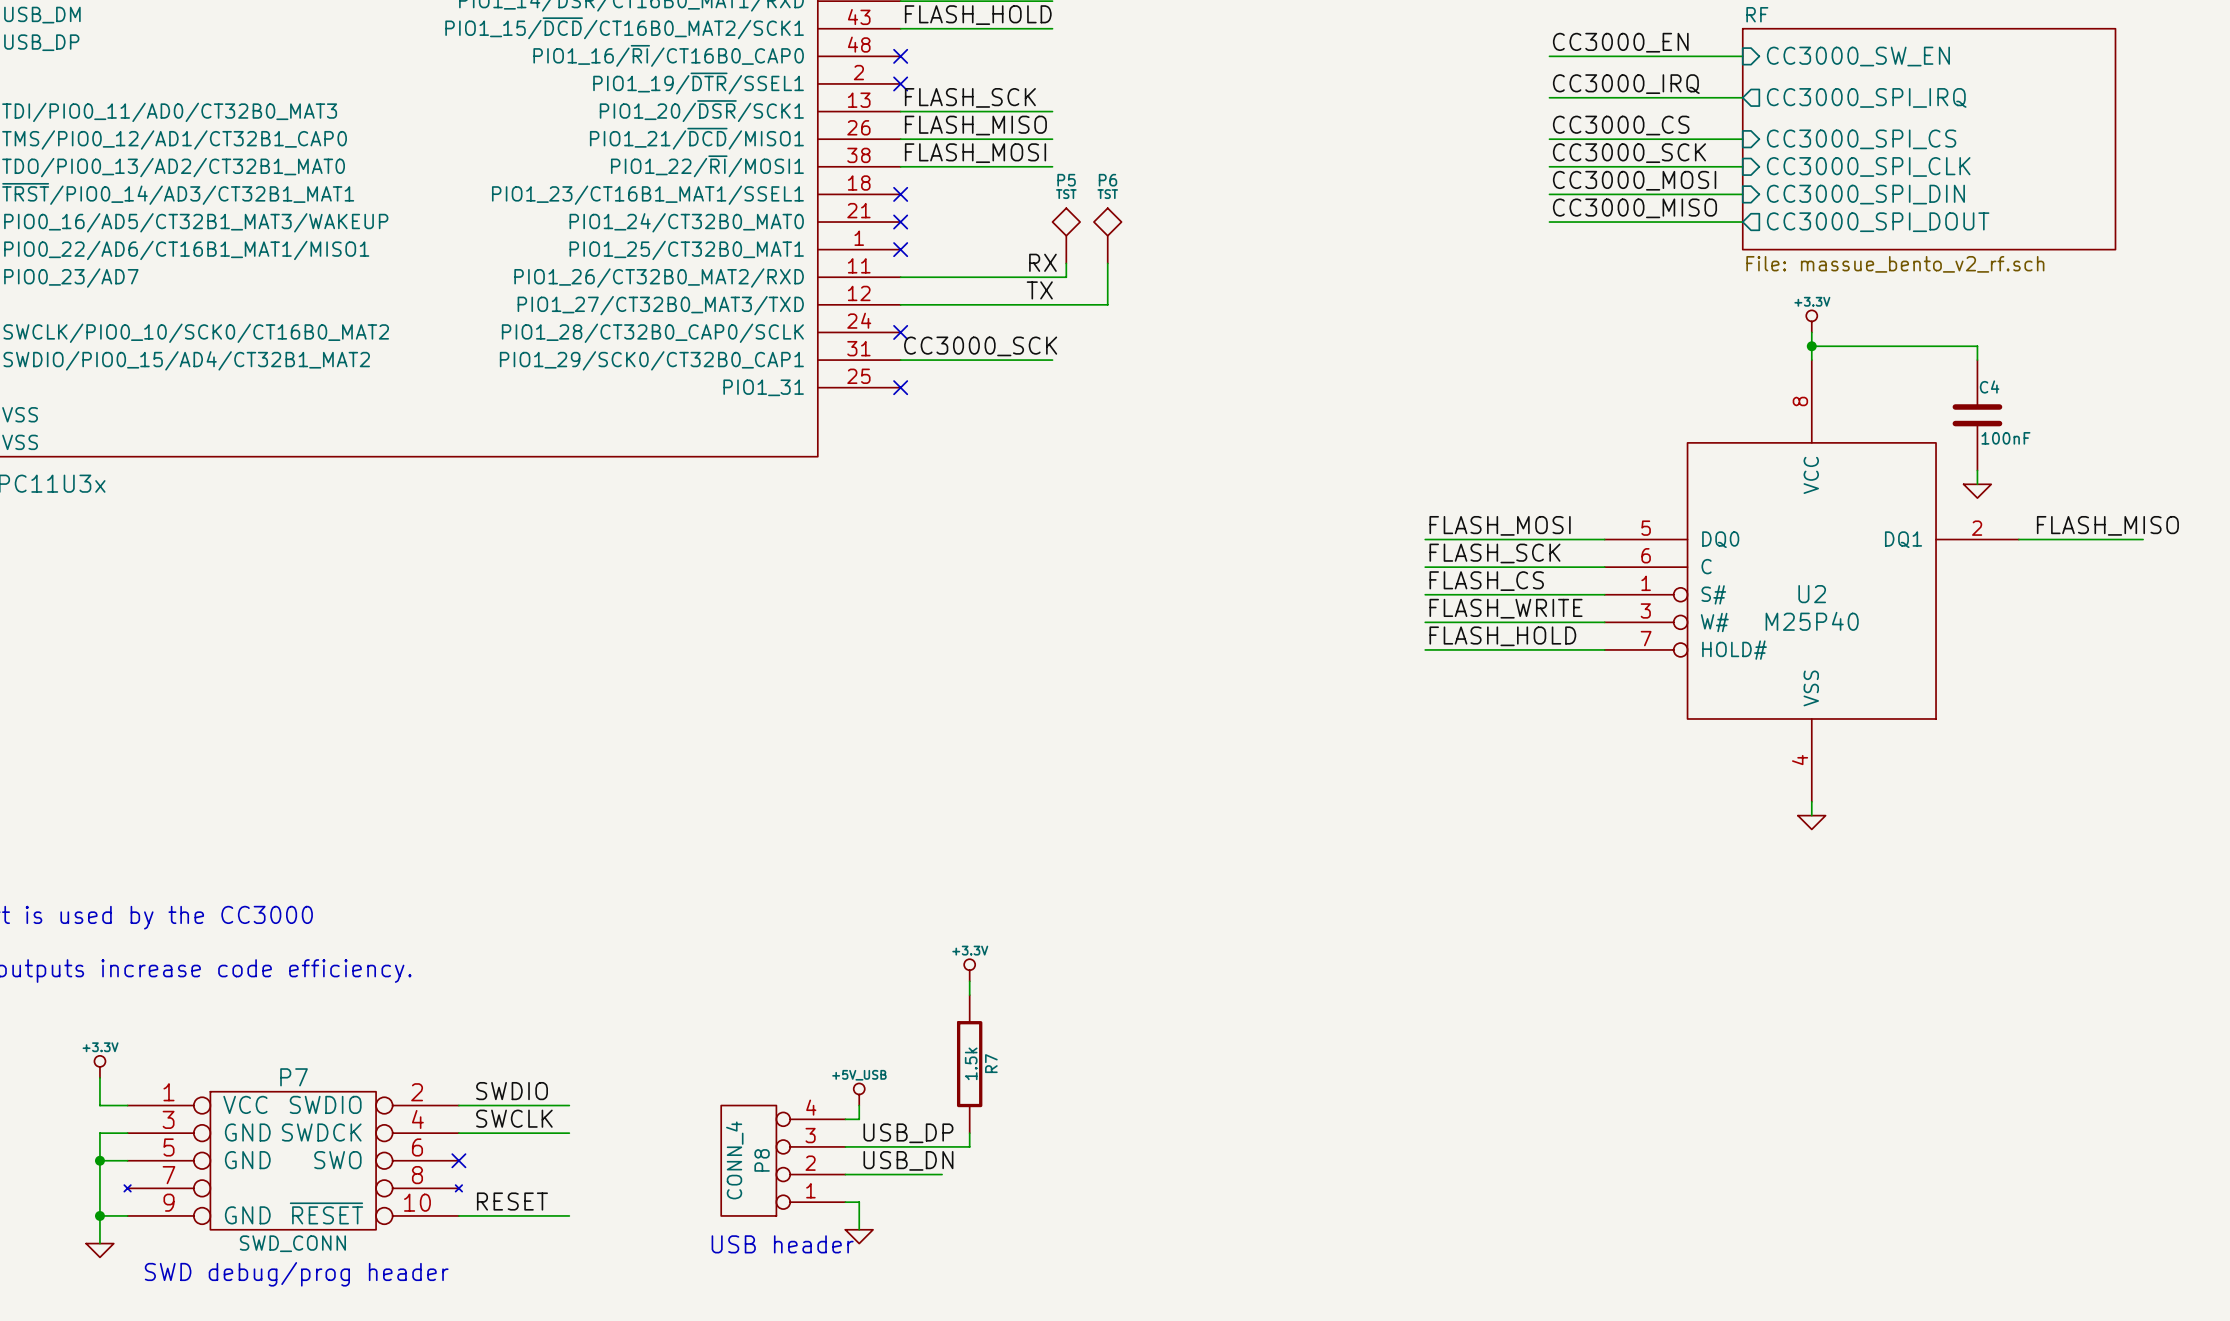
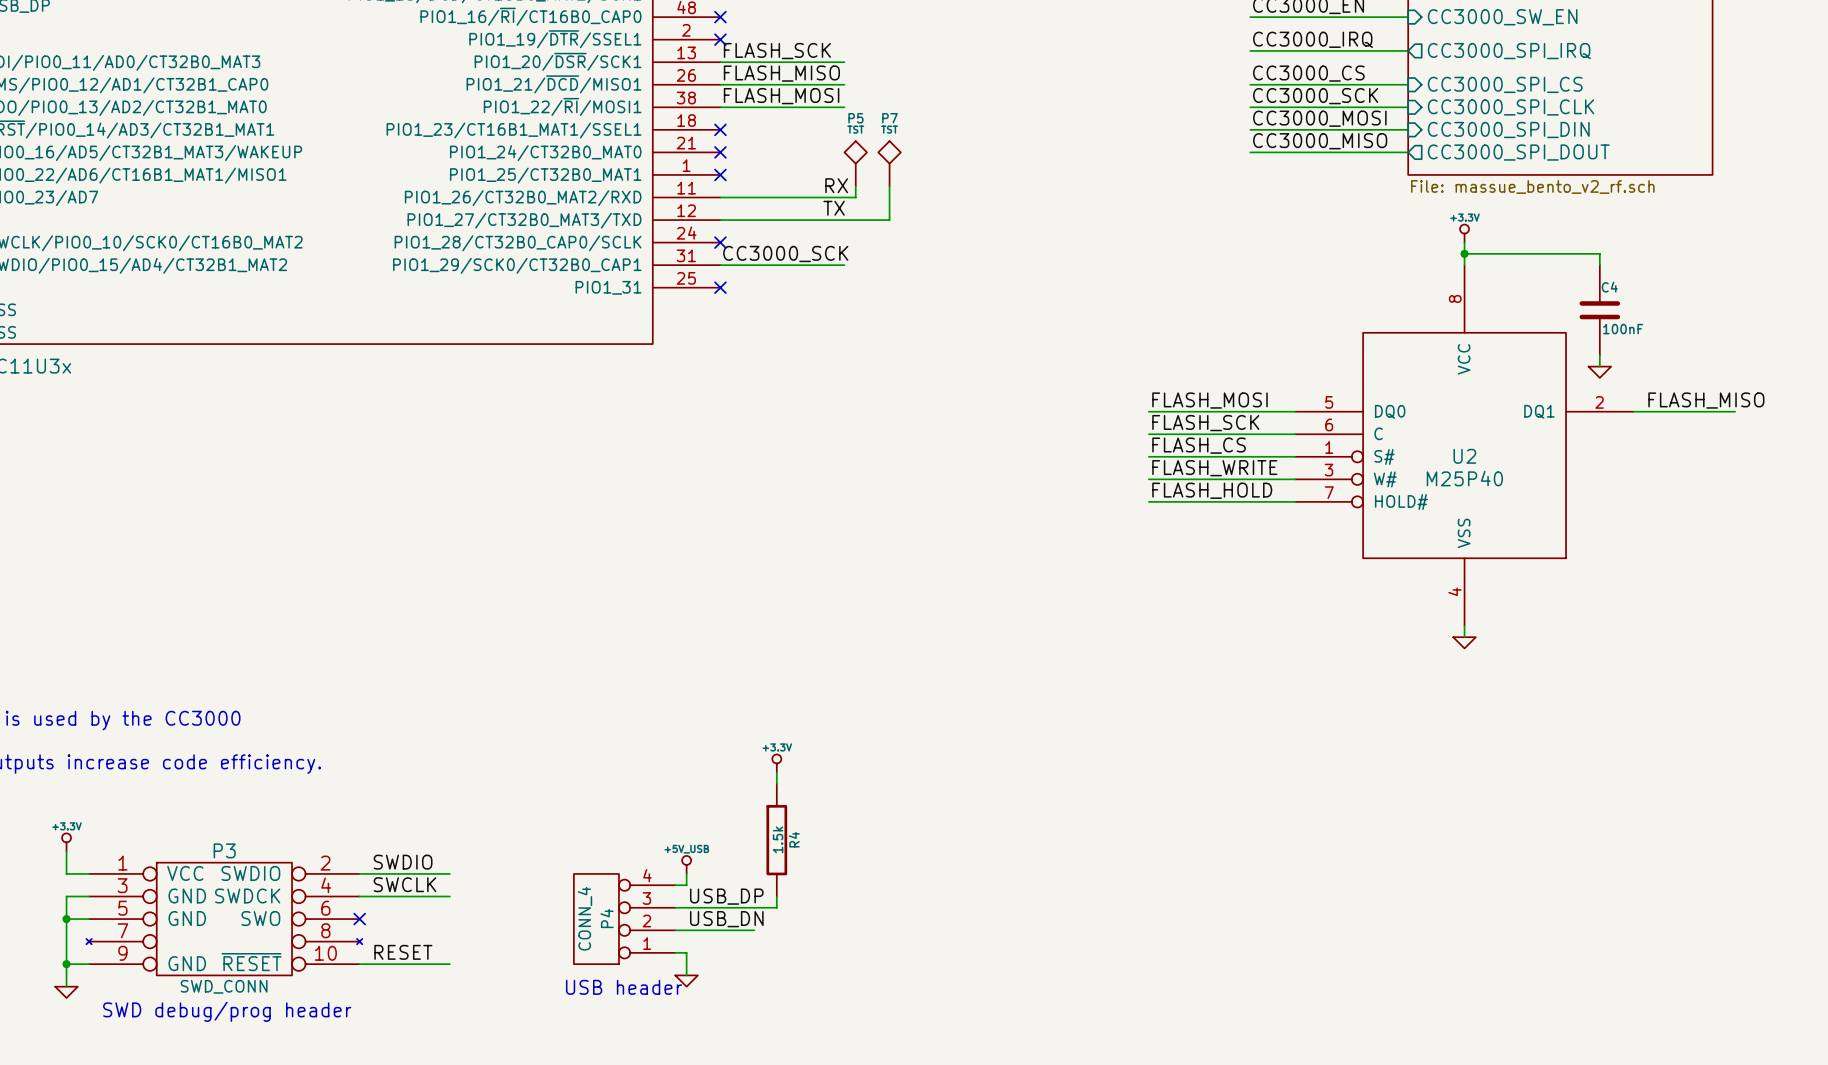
P6 name: P6 (1107, 180) -> P7 (889, 118)
R7 name: R7 (991, 1063) -> R4 (794, 839)
P7 name: P7 (294, 1077) -> P3 (224, 850)
P8 name: P8 (762, 1160) -> P4 (607, 918)

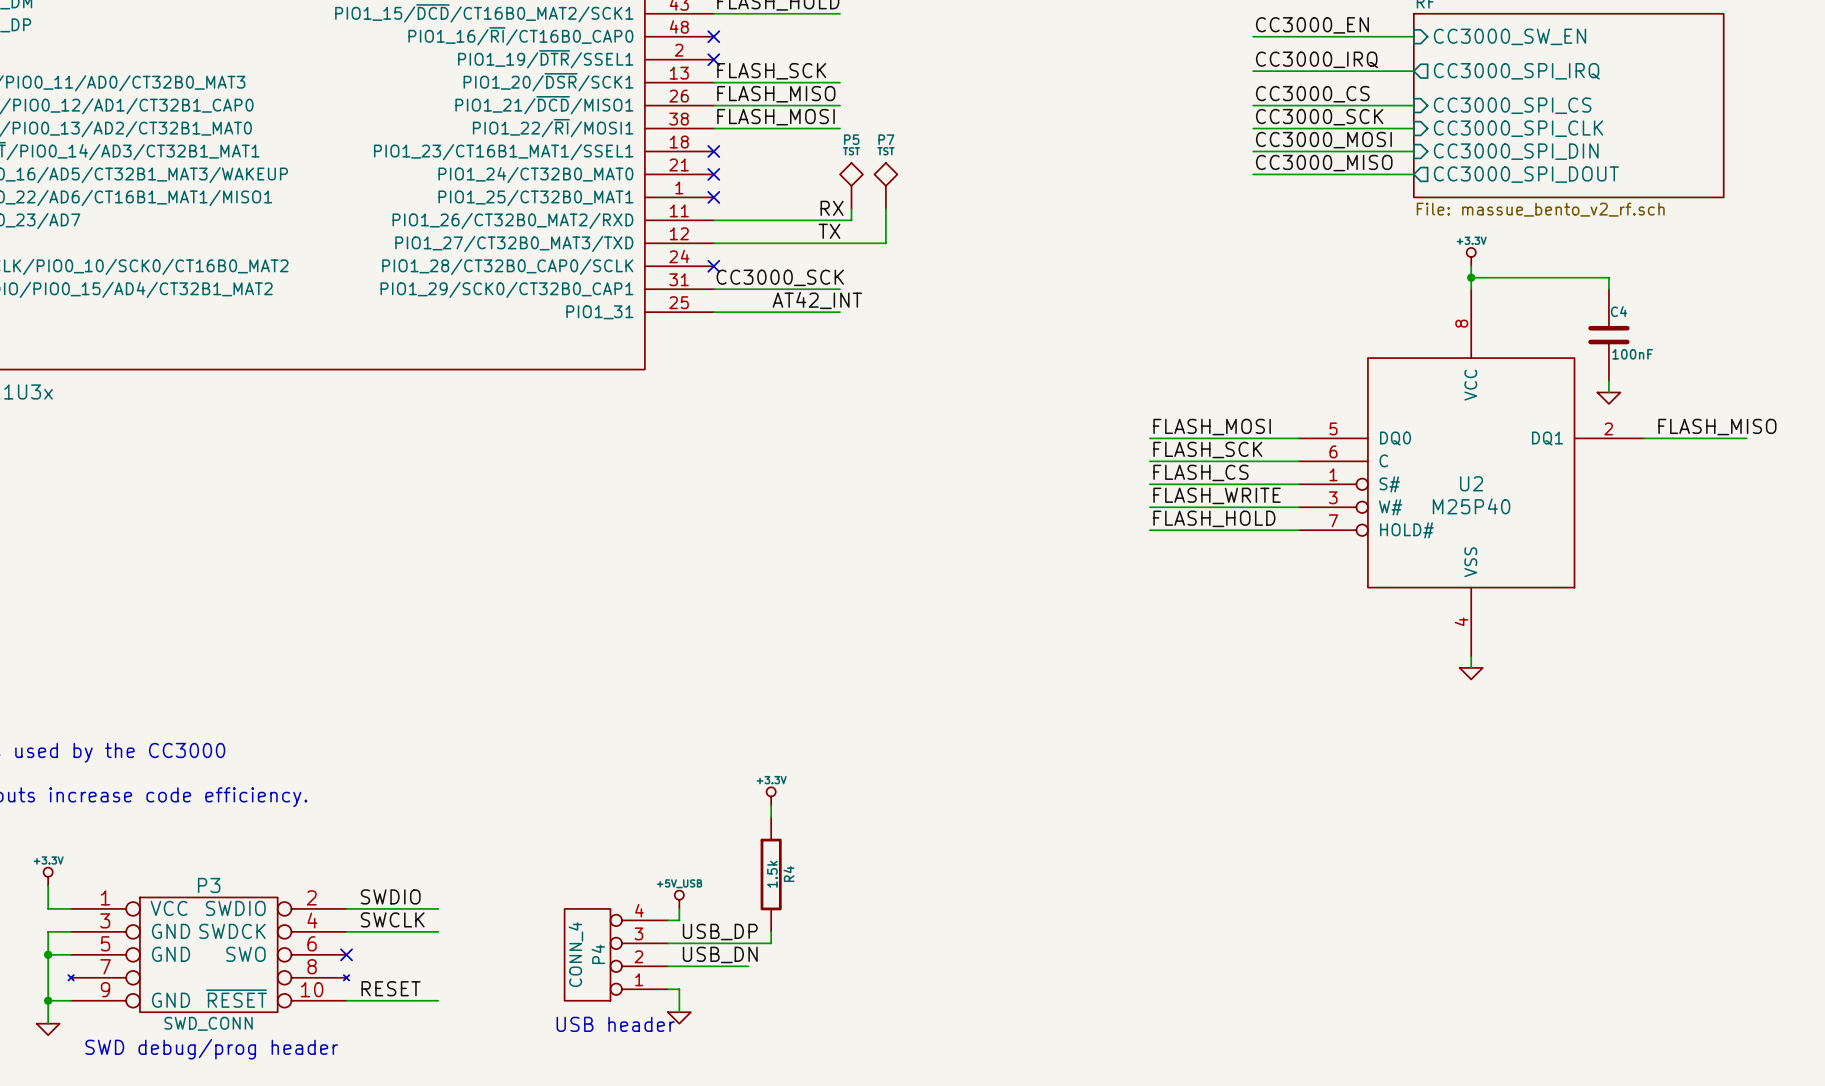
label: none -> AT42_INT (817, 300)
wire: none -> (713, 312) (840, 312)
no-connect mark: (720, 287) -> none

